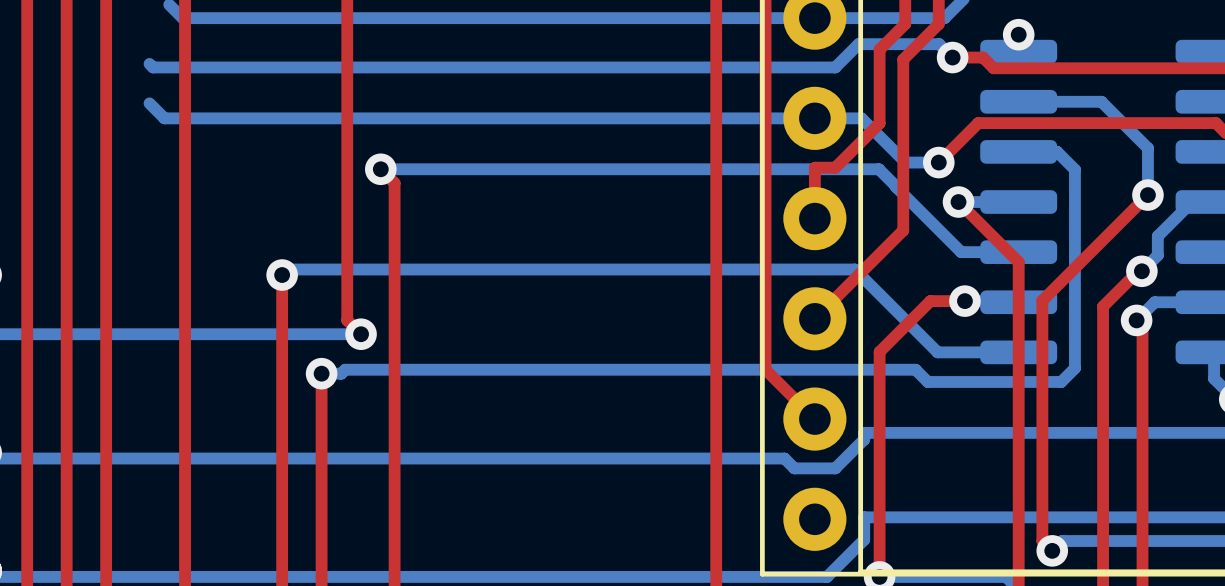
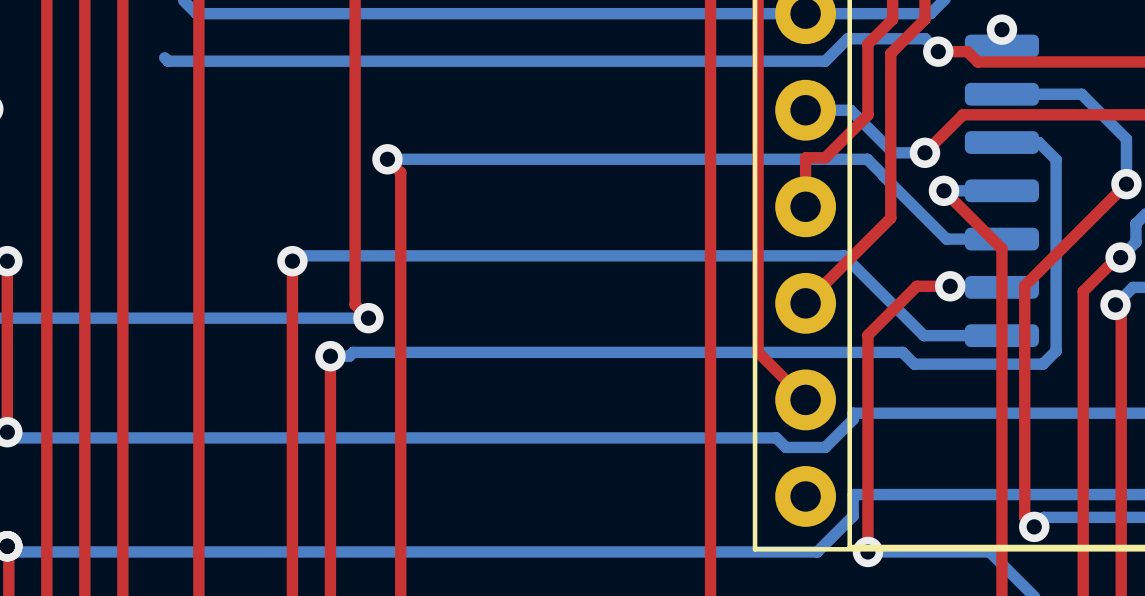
bottom track: (149, 103) (164, 118) (814, 118) -> none

